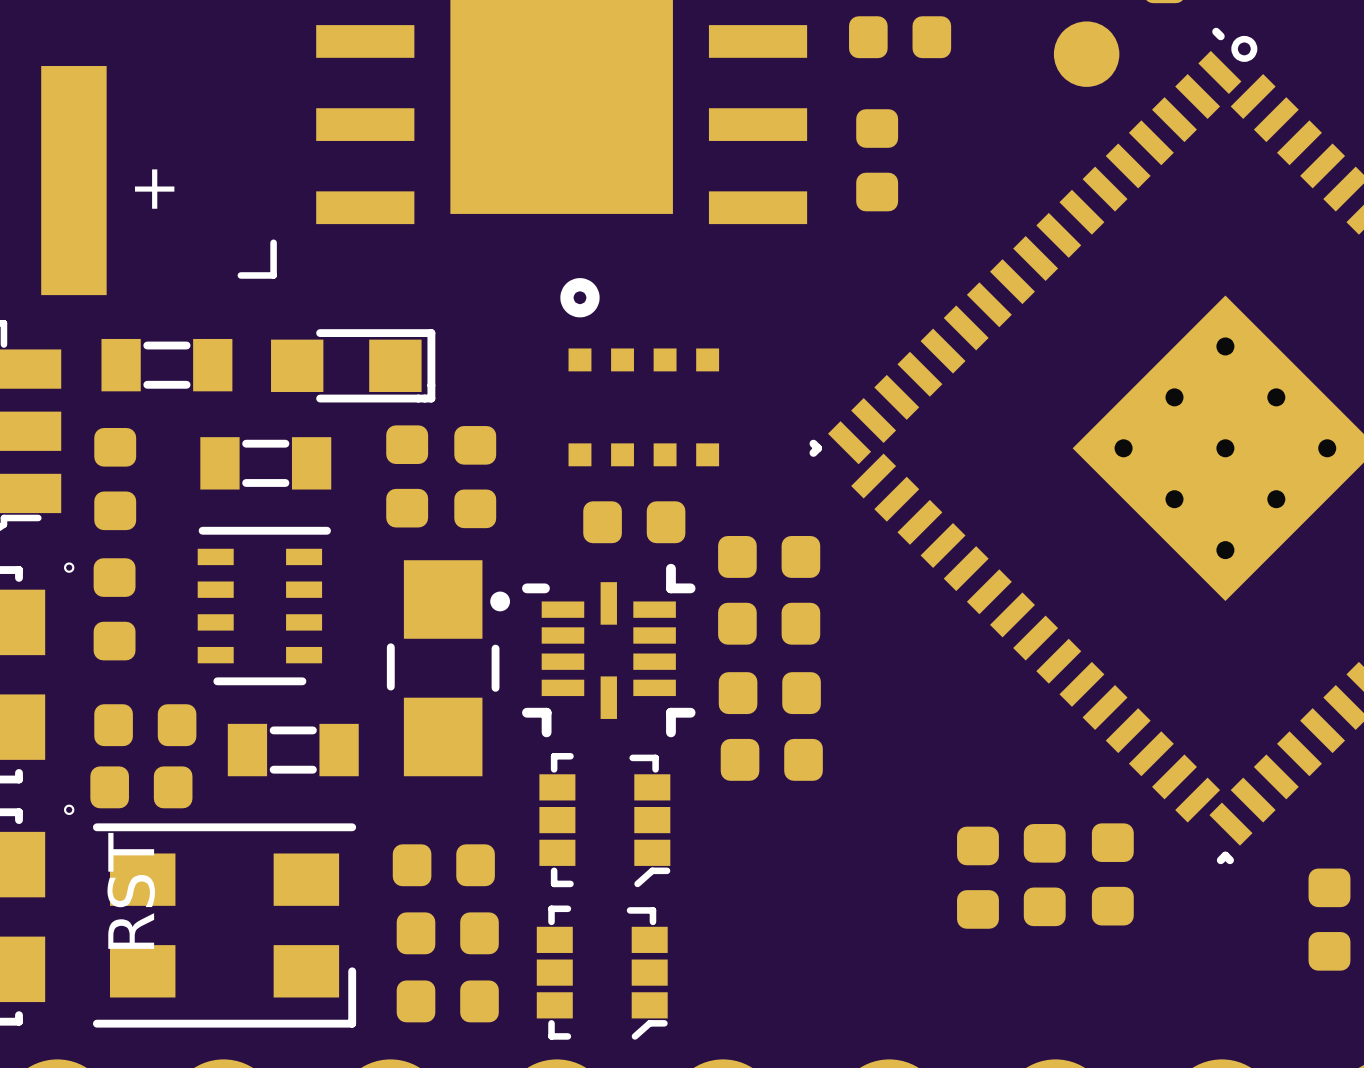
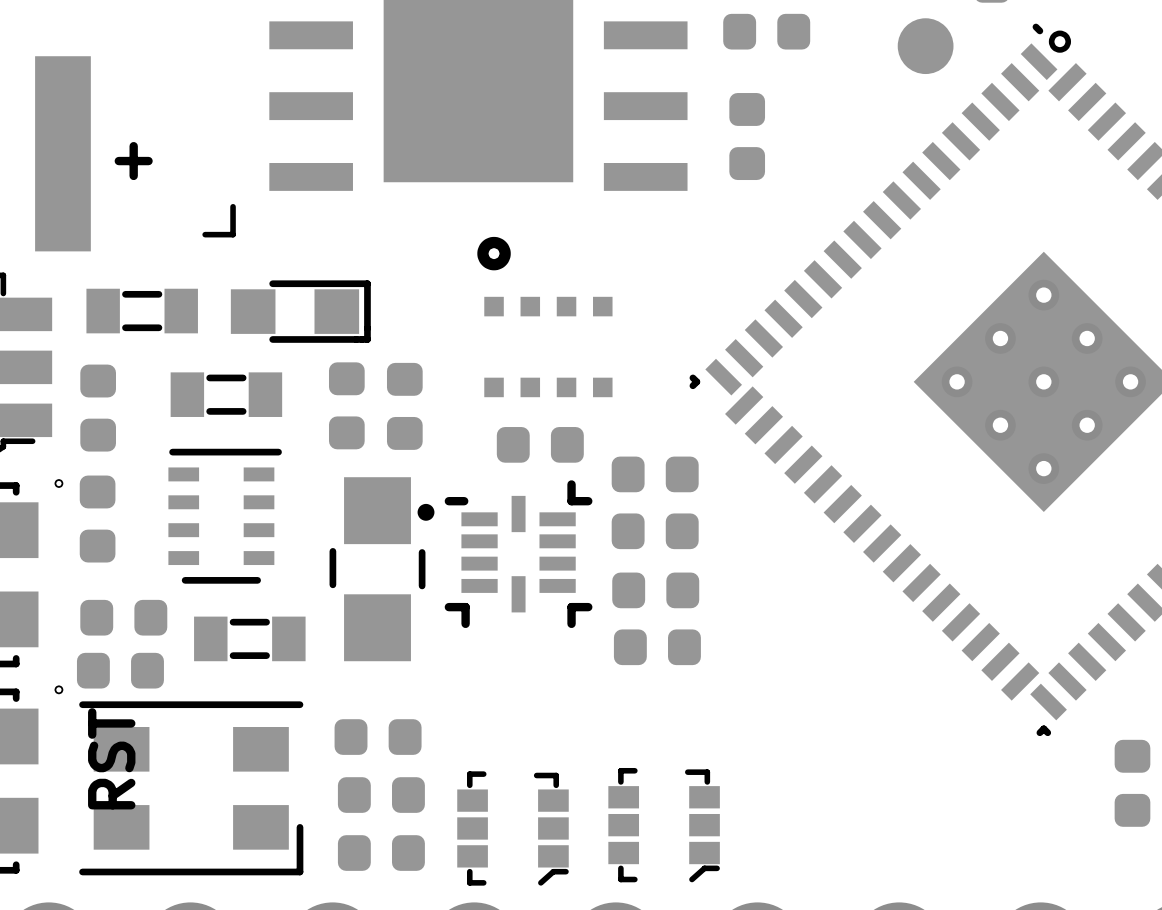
part position: (604, 820) -> (664, 825)
part: (1112, 874) -> none
part: (1044, 875) -> none
part: (977, 877) -> none

